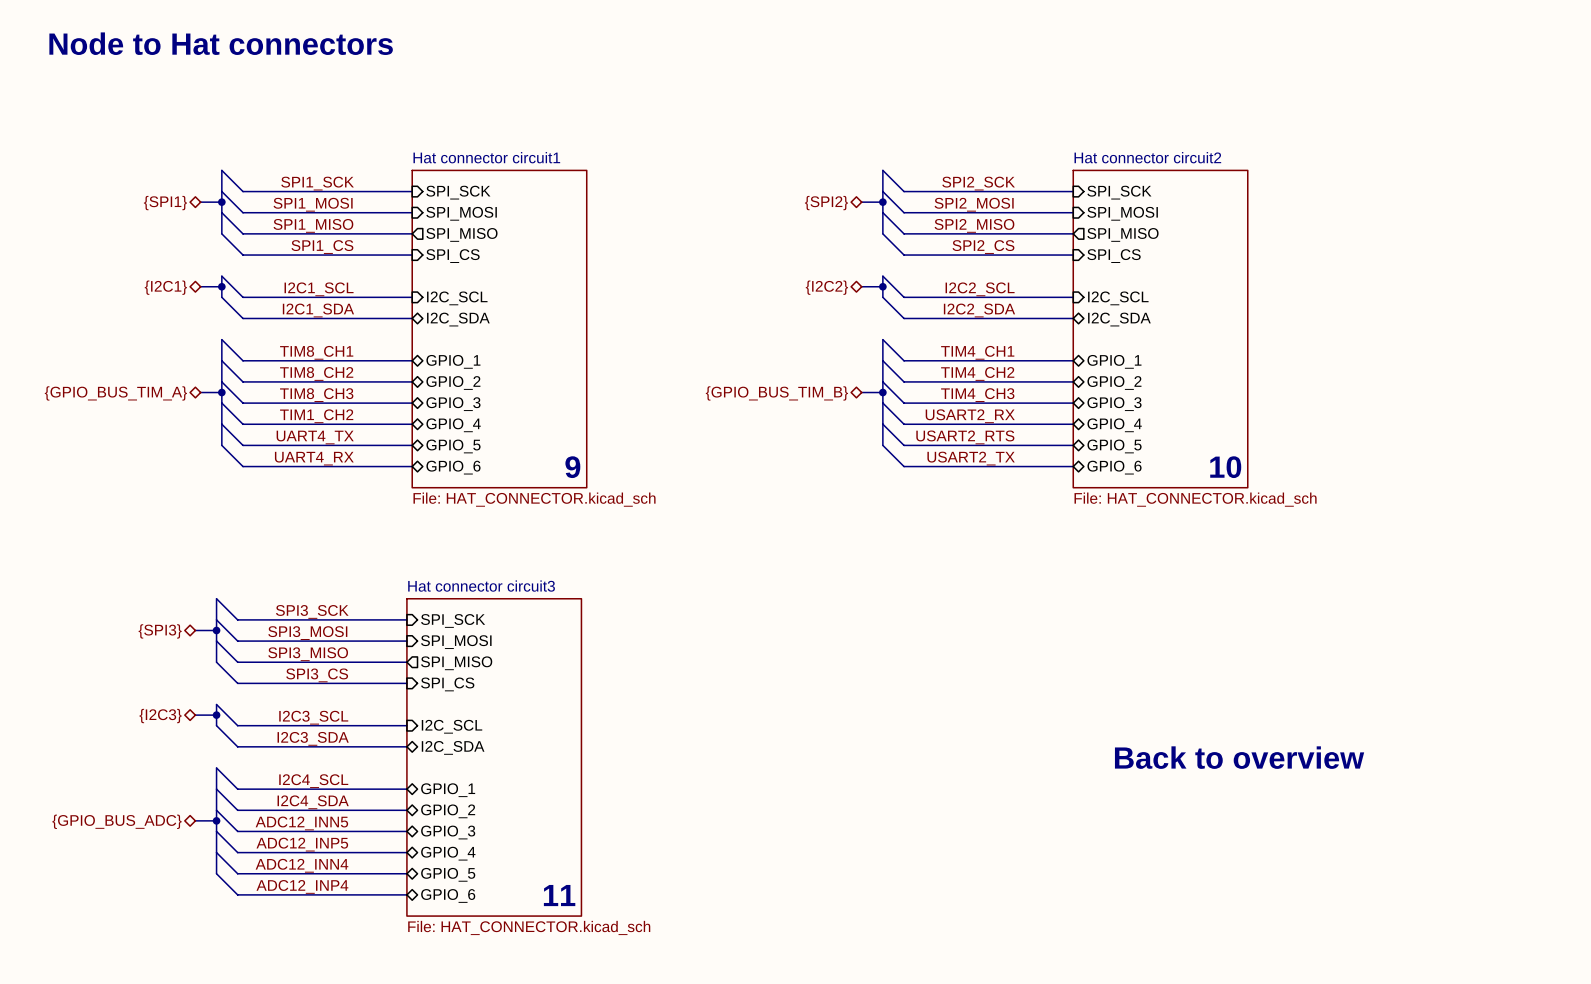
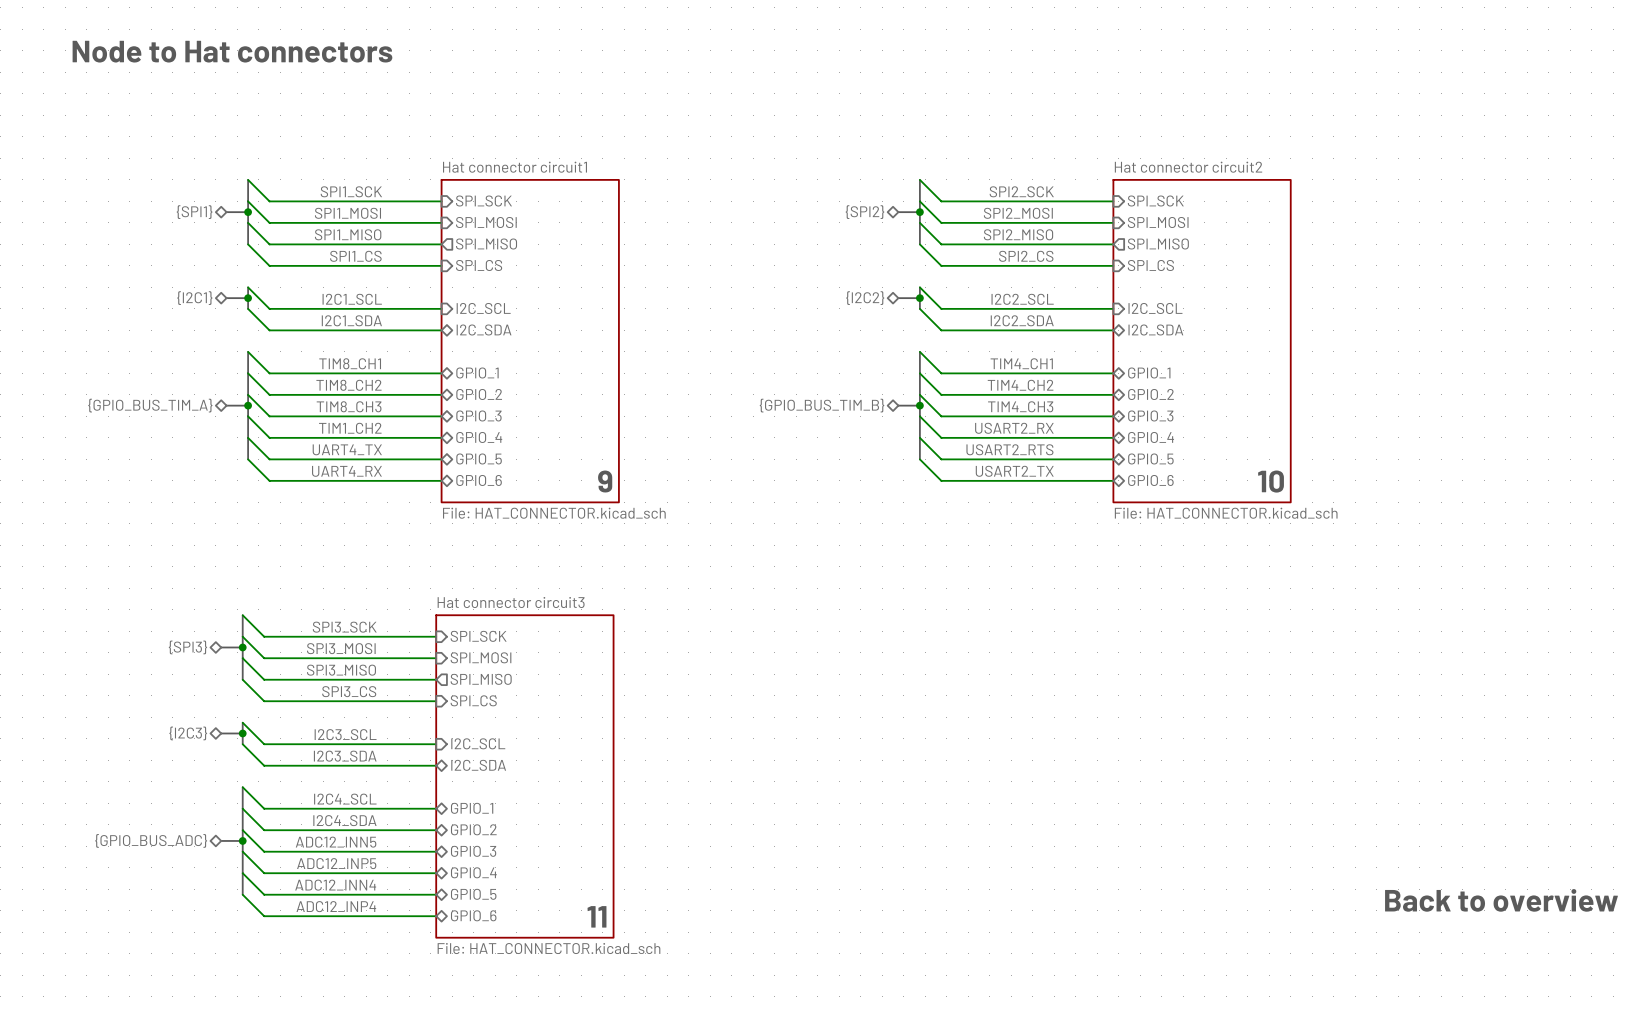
text: Back to overview (1239, 757) -> none
text: none -> Back to overview (1501, 900)

